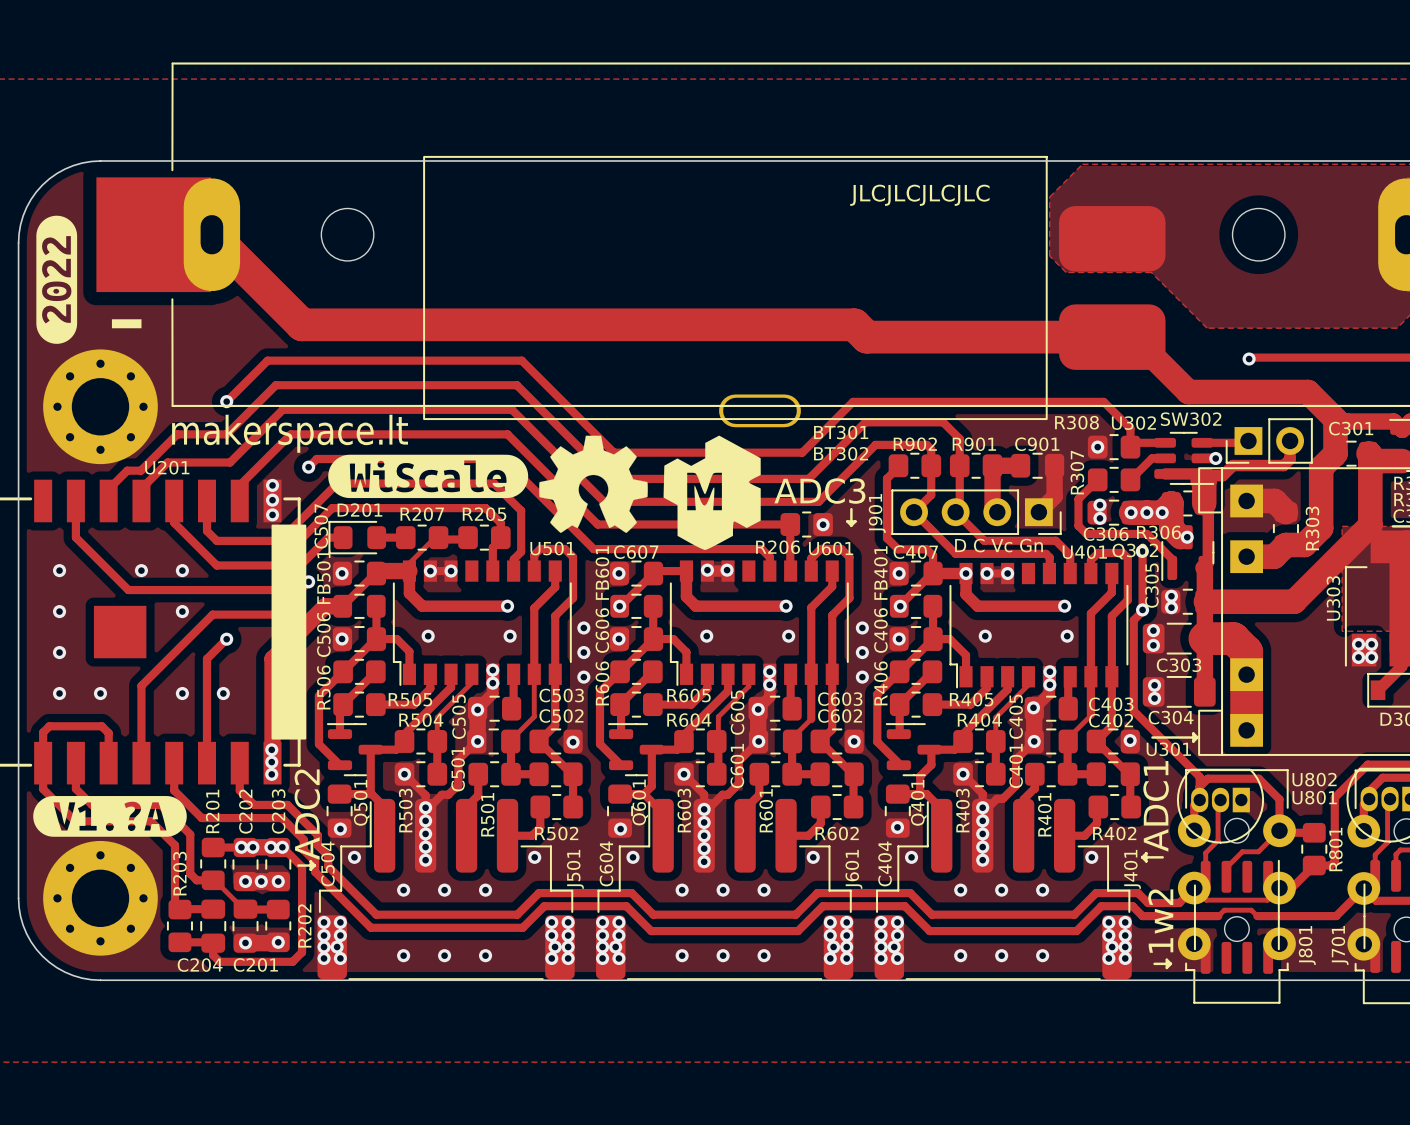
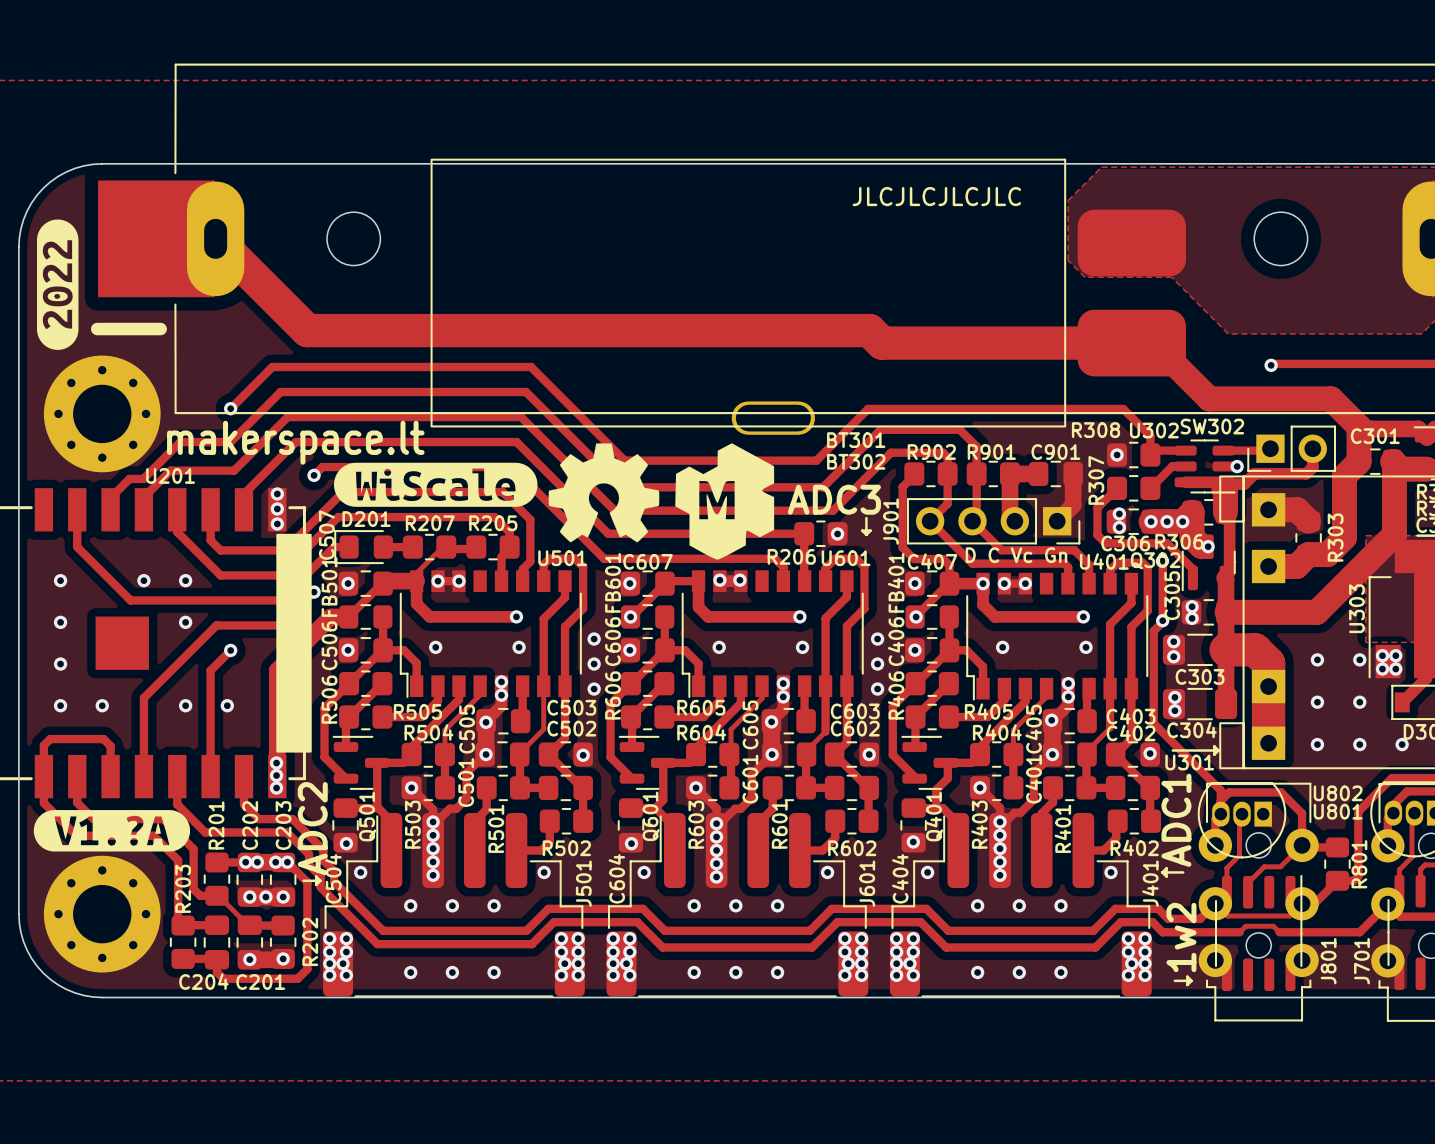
via: none -> (1317, 659)
via: none -> (1359, 659)
via: none -> (1317, 702)
via: none -> (1359, 702)
via: none -> (1317, 744)
via: none -> (1359, 744)
via: none -> (1402, 744)

